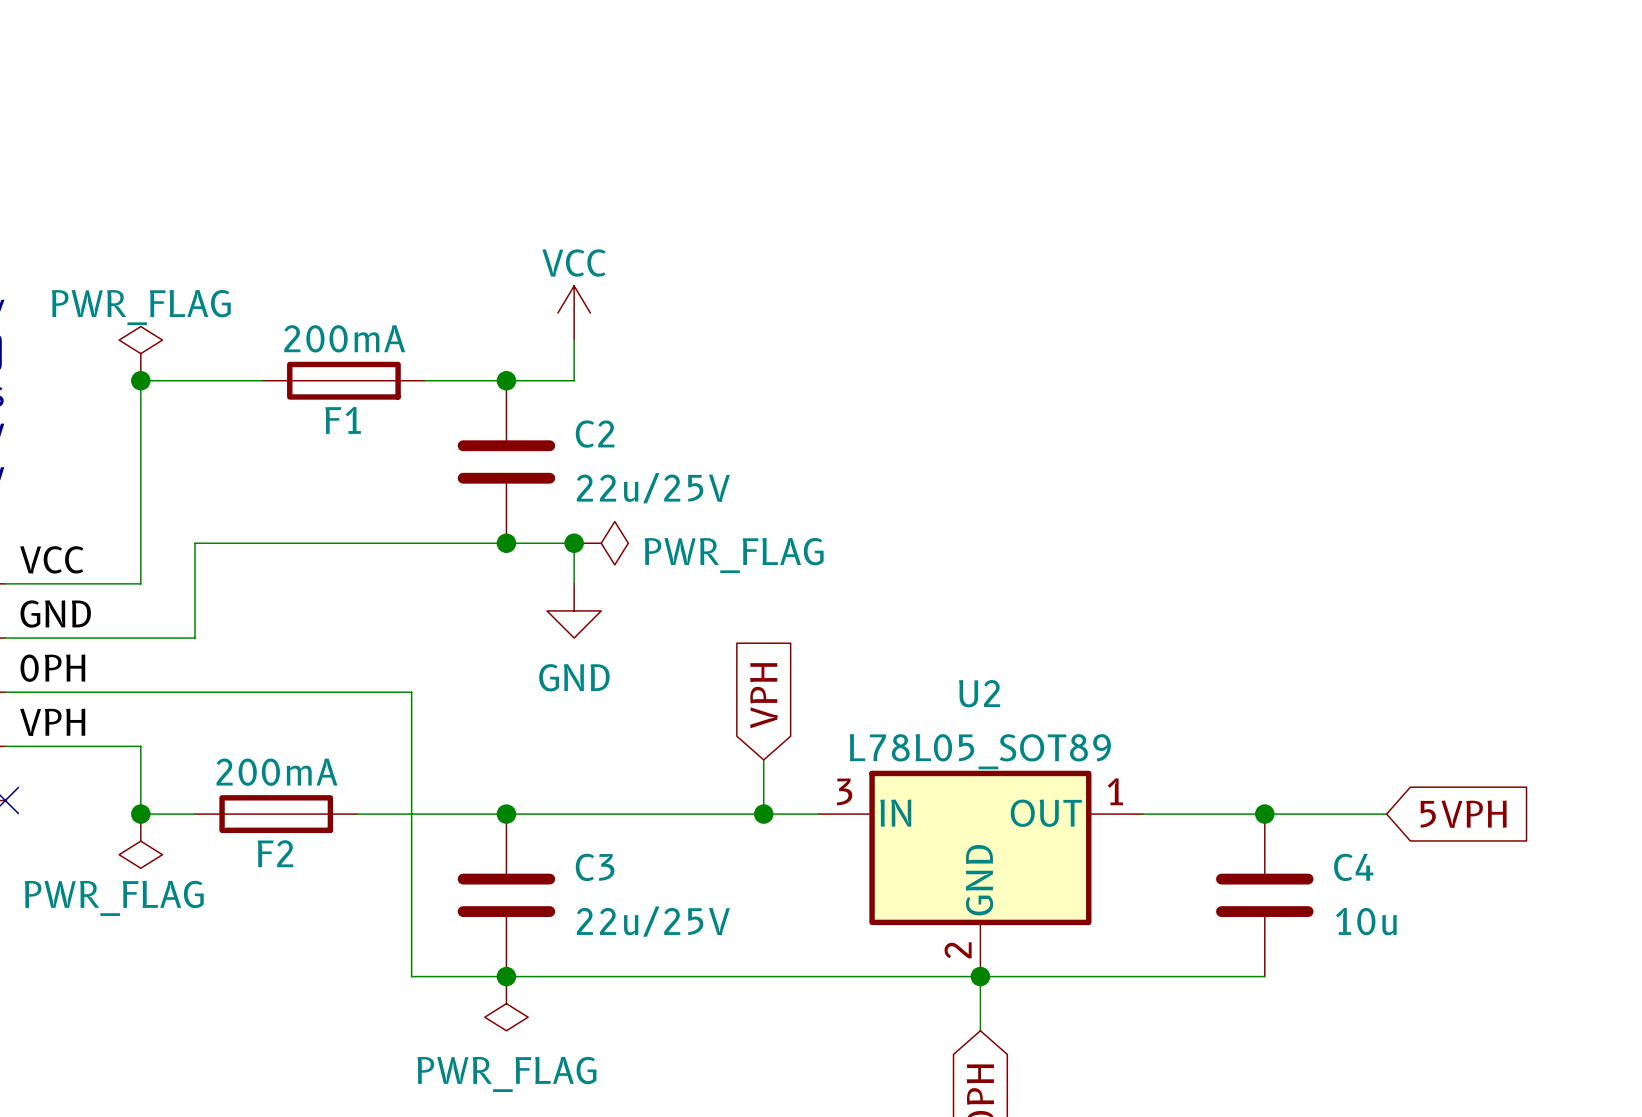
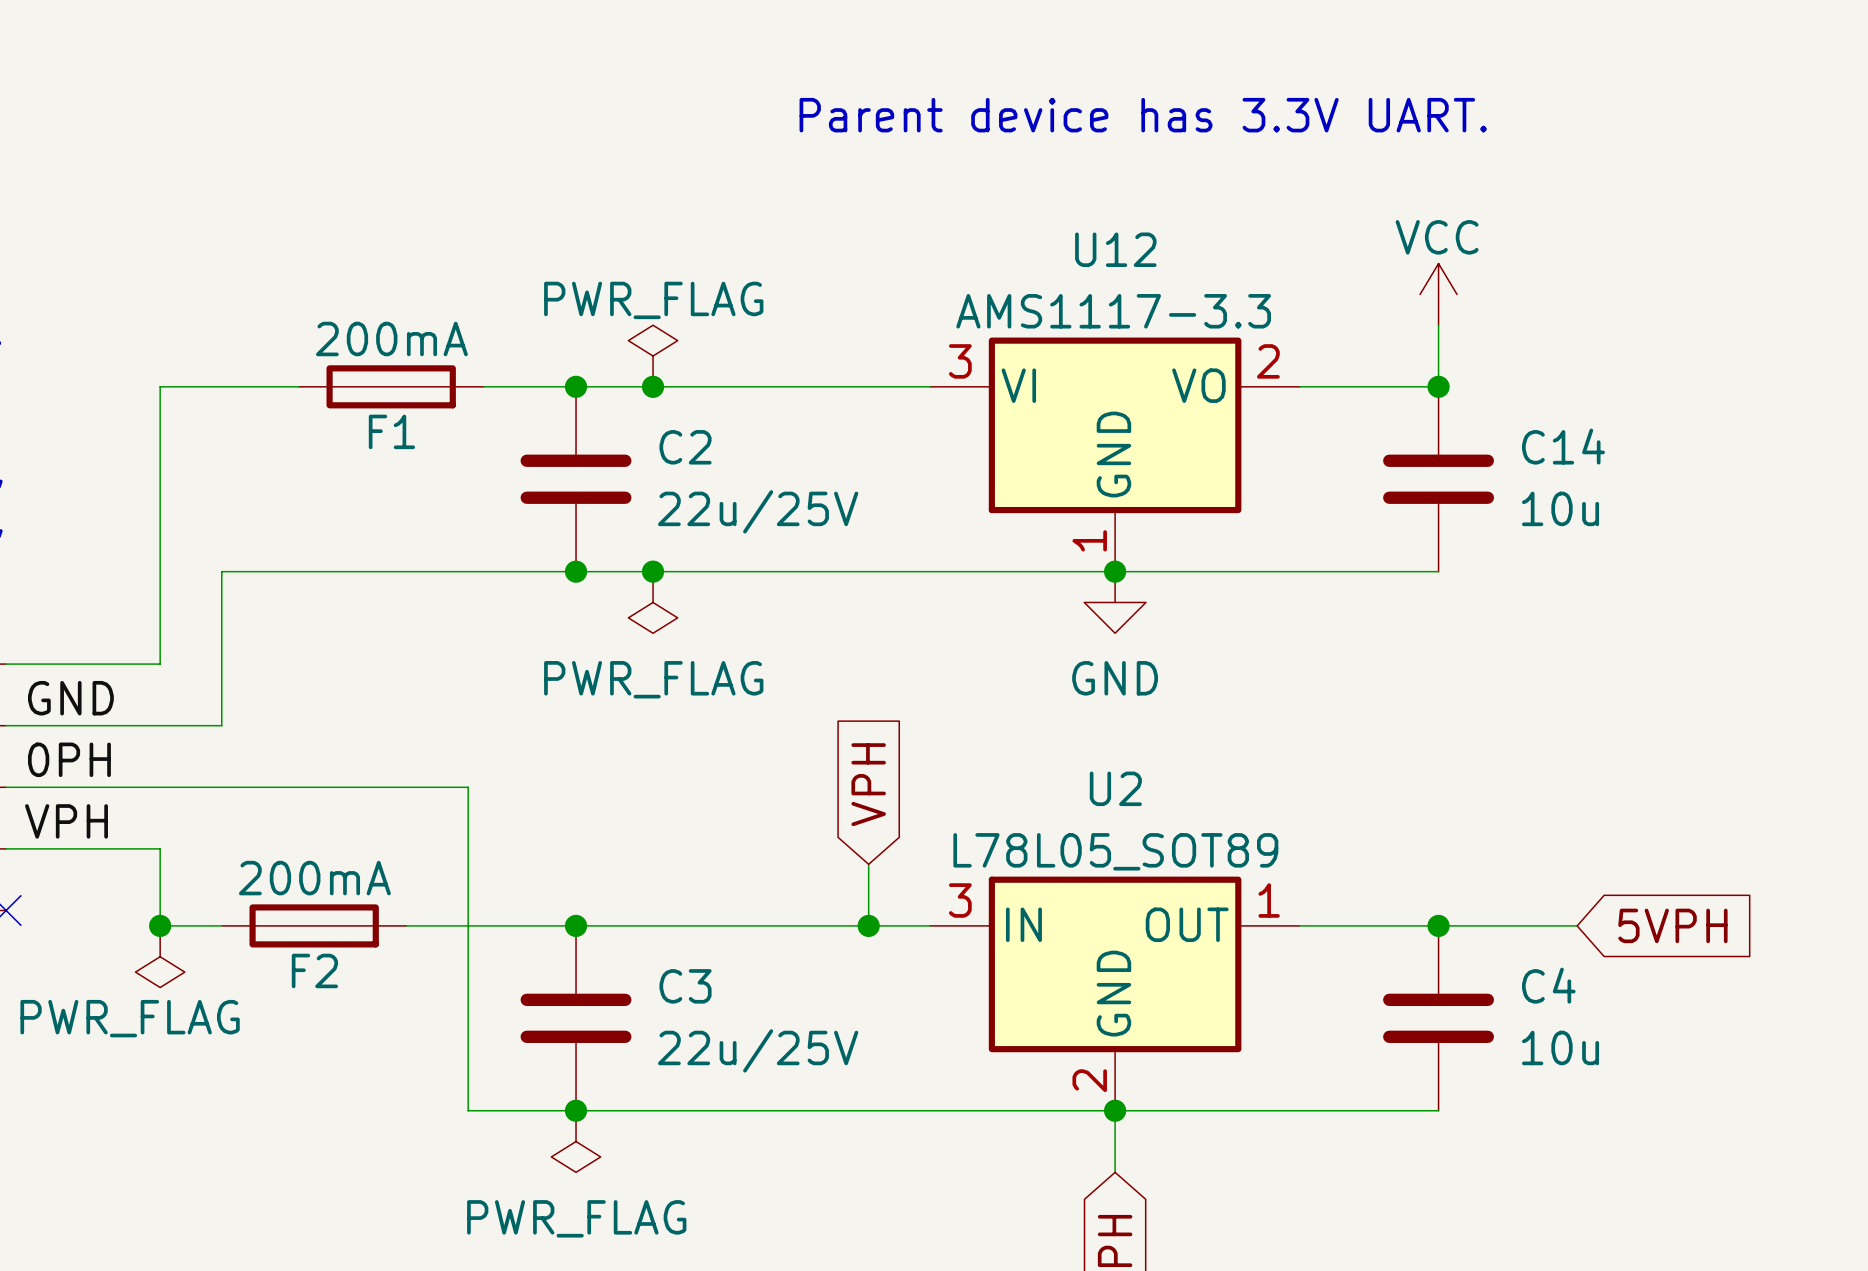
text: none -> Parent device has 3.3V UART. (1143, 115)
power symbol: none -> VCC (1438, 294)
wire: none -> (1438, 325) (1438, 386) (1299, 386)
power symbol: VCC (574, 313) -> PWR_FLAG (653, 356)
wire: none -> (483, 386) (930, 386)
junction: none -> (576, 386)
wire: (574, 340) (574, 380) (425, 380) -> none
junction: none -> (653, 386)
junction: none -> (1438, 386)
power symbol: PWR_FLAG (140, 353) -> none
wire: (140, 380) (262, 380) -> (160, 433) (160, 386) (298, 386)
junction: (140, 380) -> none
F1 position: (343, 380) -> (391, 386)
junction: (506, 380) -> none
U12: none -> AMS1117-3.3 (1115, 454)
C14: none -> 10u (1438, 479)
C2 position: (506, 461) -> (576, 479)
junction: none -> (576, 571)
junction: none -> (653, 571)
junction: none -> (1115, 571)
wire: (194, 543) (574, 543) (574, 583) -> (221, 617) (221, 571) (1438, 571)
junction: (506, 543) -> none
junction: (574, 543) -> none
power symbol rotation: 0° (601, 543) -> 90° clockwise (653, 602)
power symbol text position: PWR_FLAG (734, 555) -> PWR_FLAG (653, 679)
label: VCC (51, 559) -> none
power symbol position: GND (574, 610) -> GND (1115, 602)

